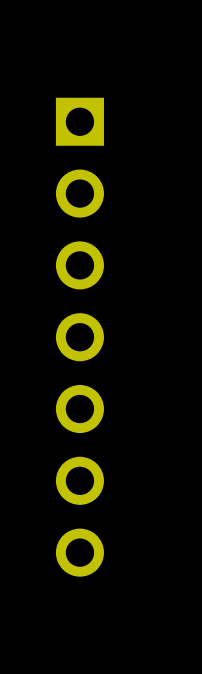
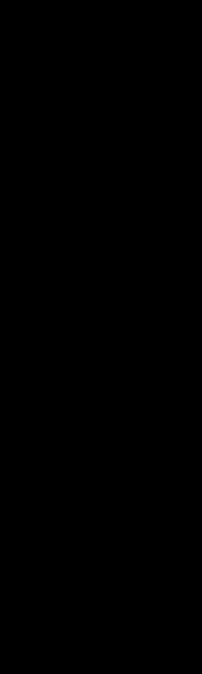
part: (79, 337) -> none

